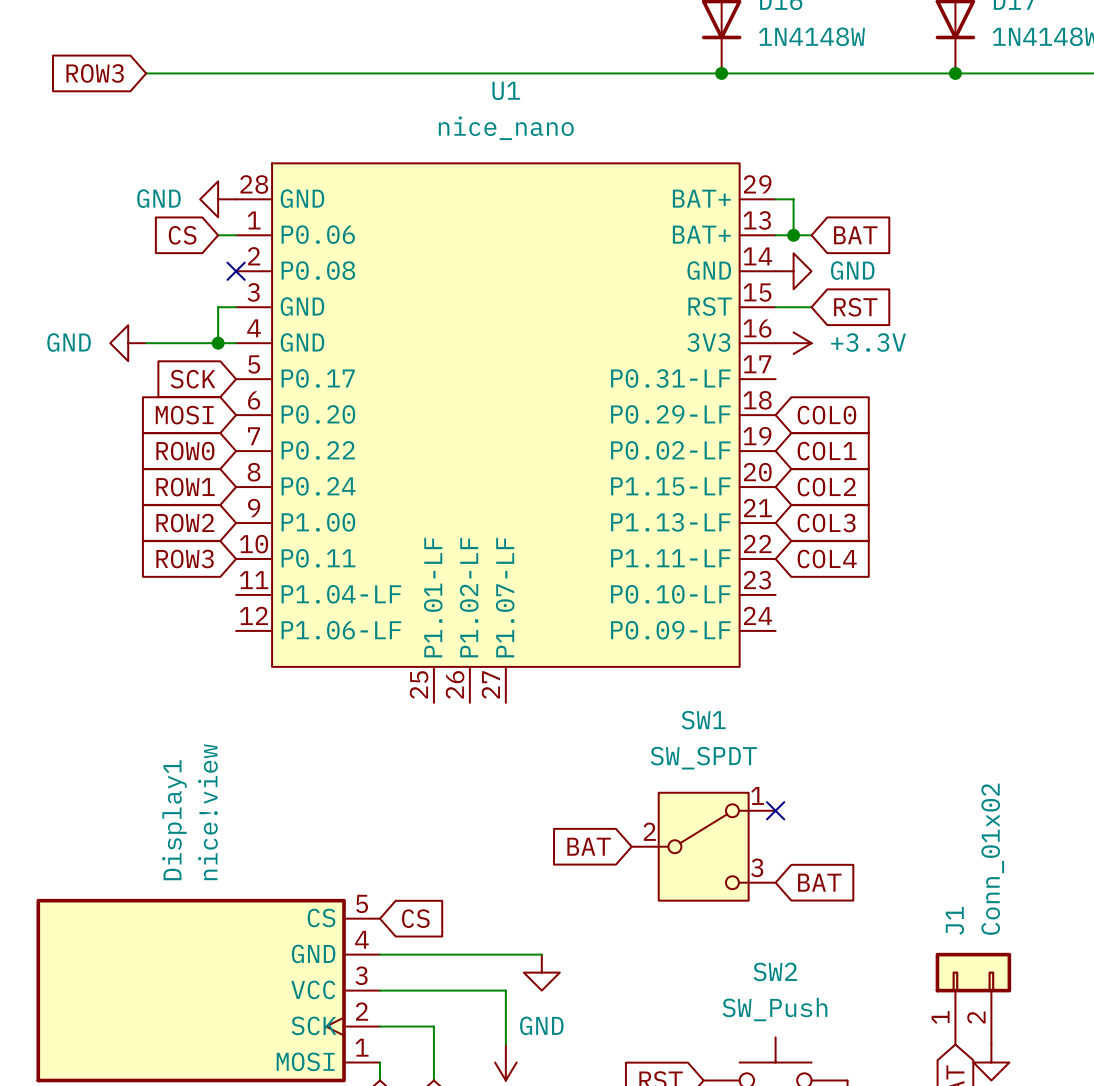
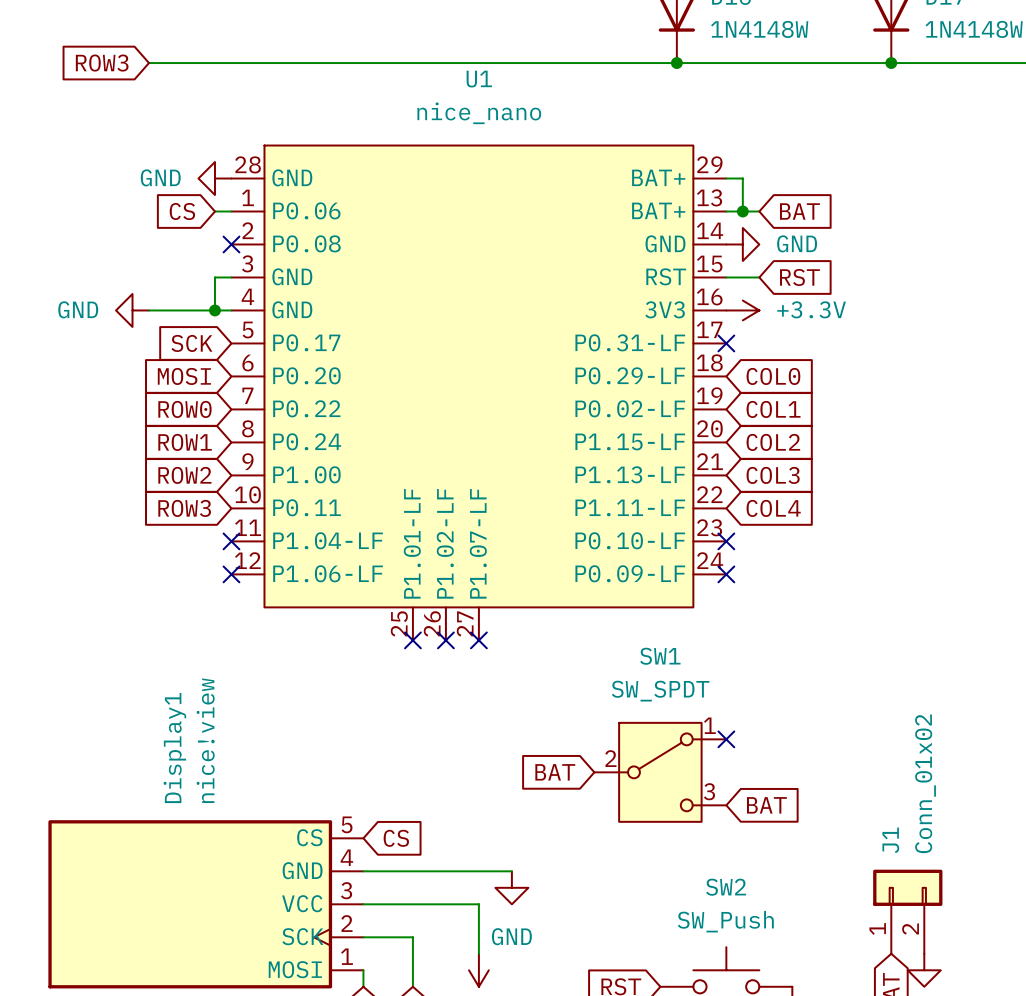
no-connect mark: none -> (726, 343)
no-connect mark: none -> (231, 541)
no-connect mark: none -> (726, 541)
no-connect mark: none -> (231, 574)
no-connect mark: none -> (726, 574)
no-connect mark: none -> (412, 640)
no-connect mark: none -> (445, 640)
no-connect mark: none -> (478, 640)

